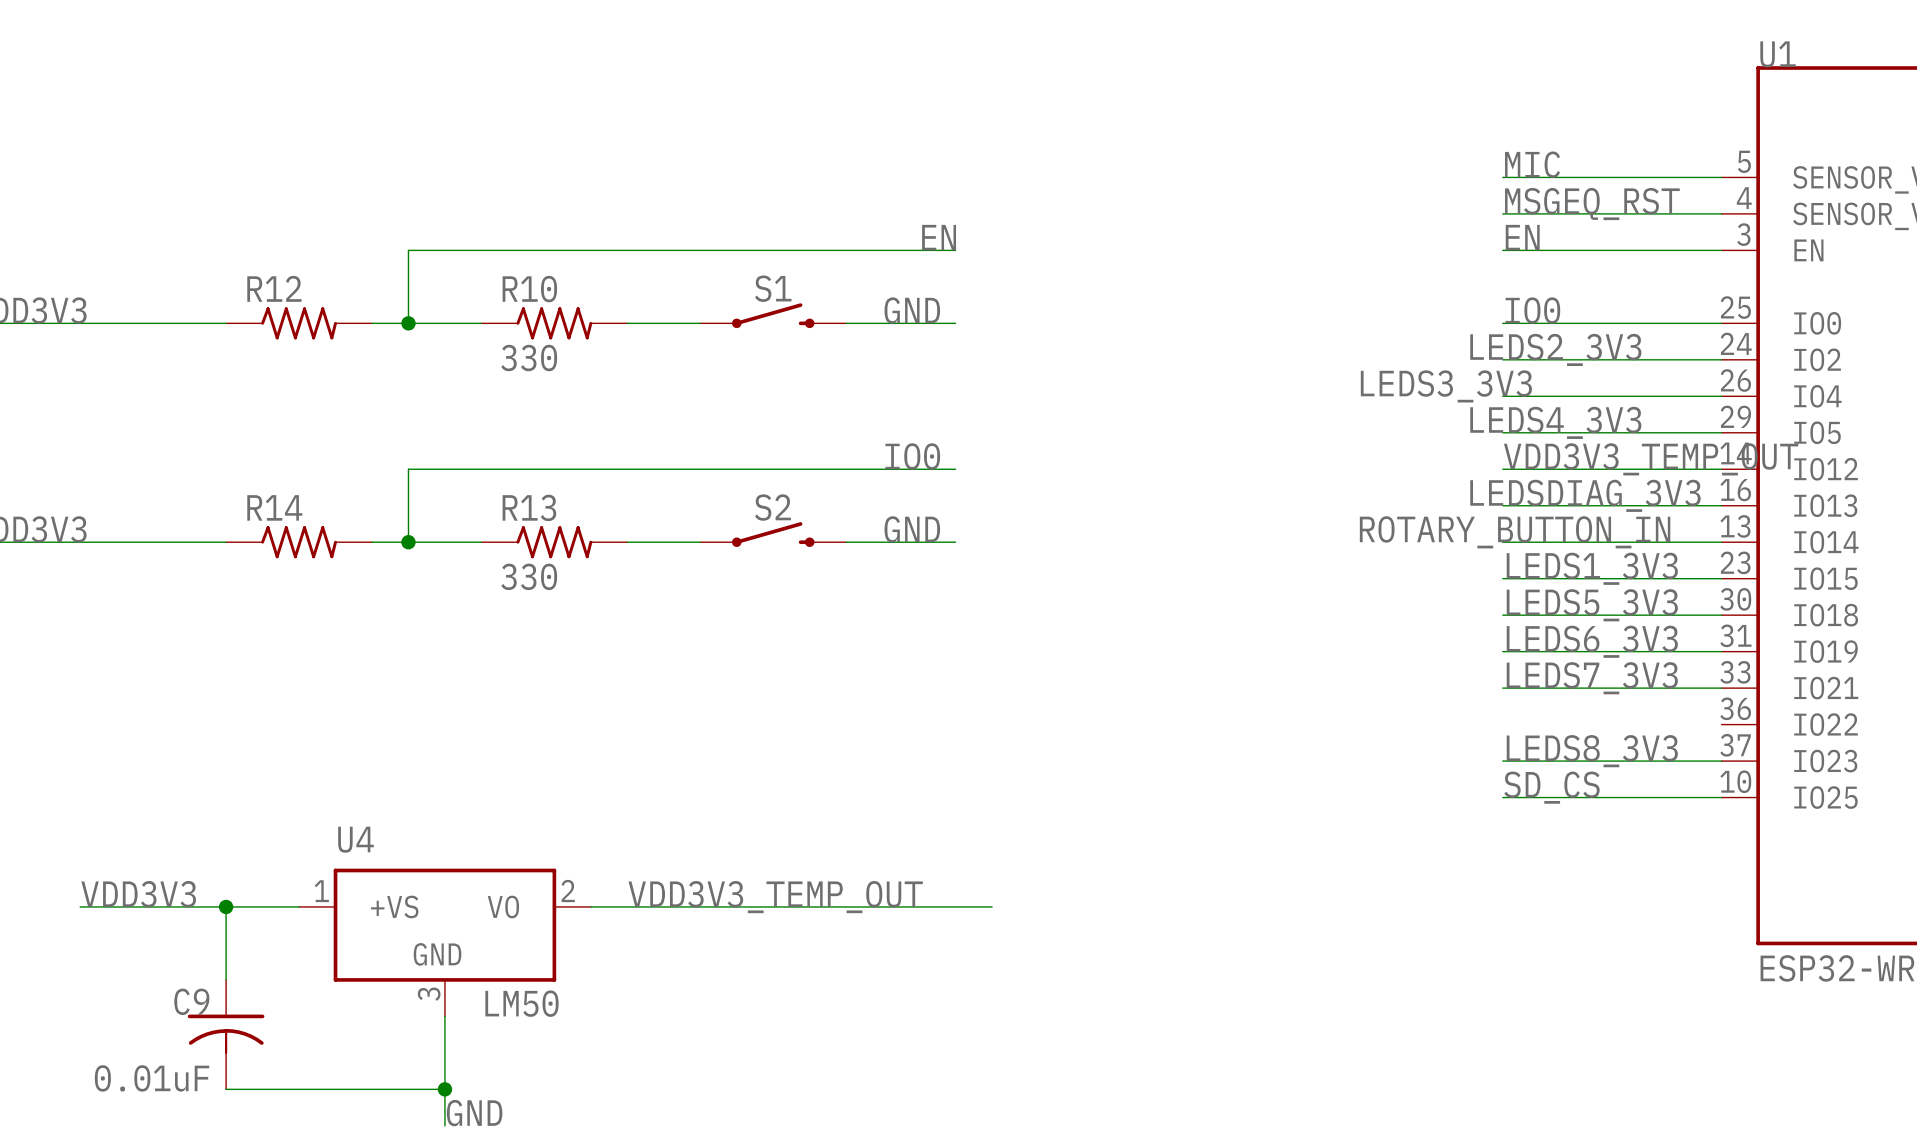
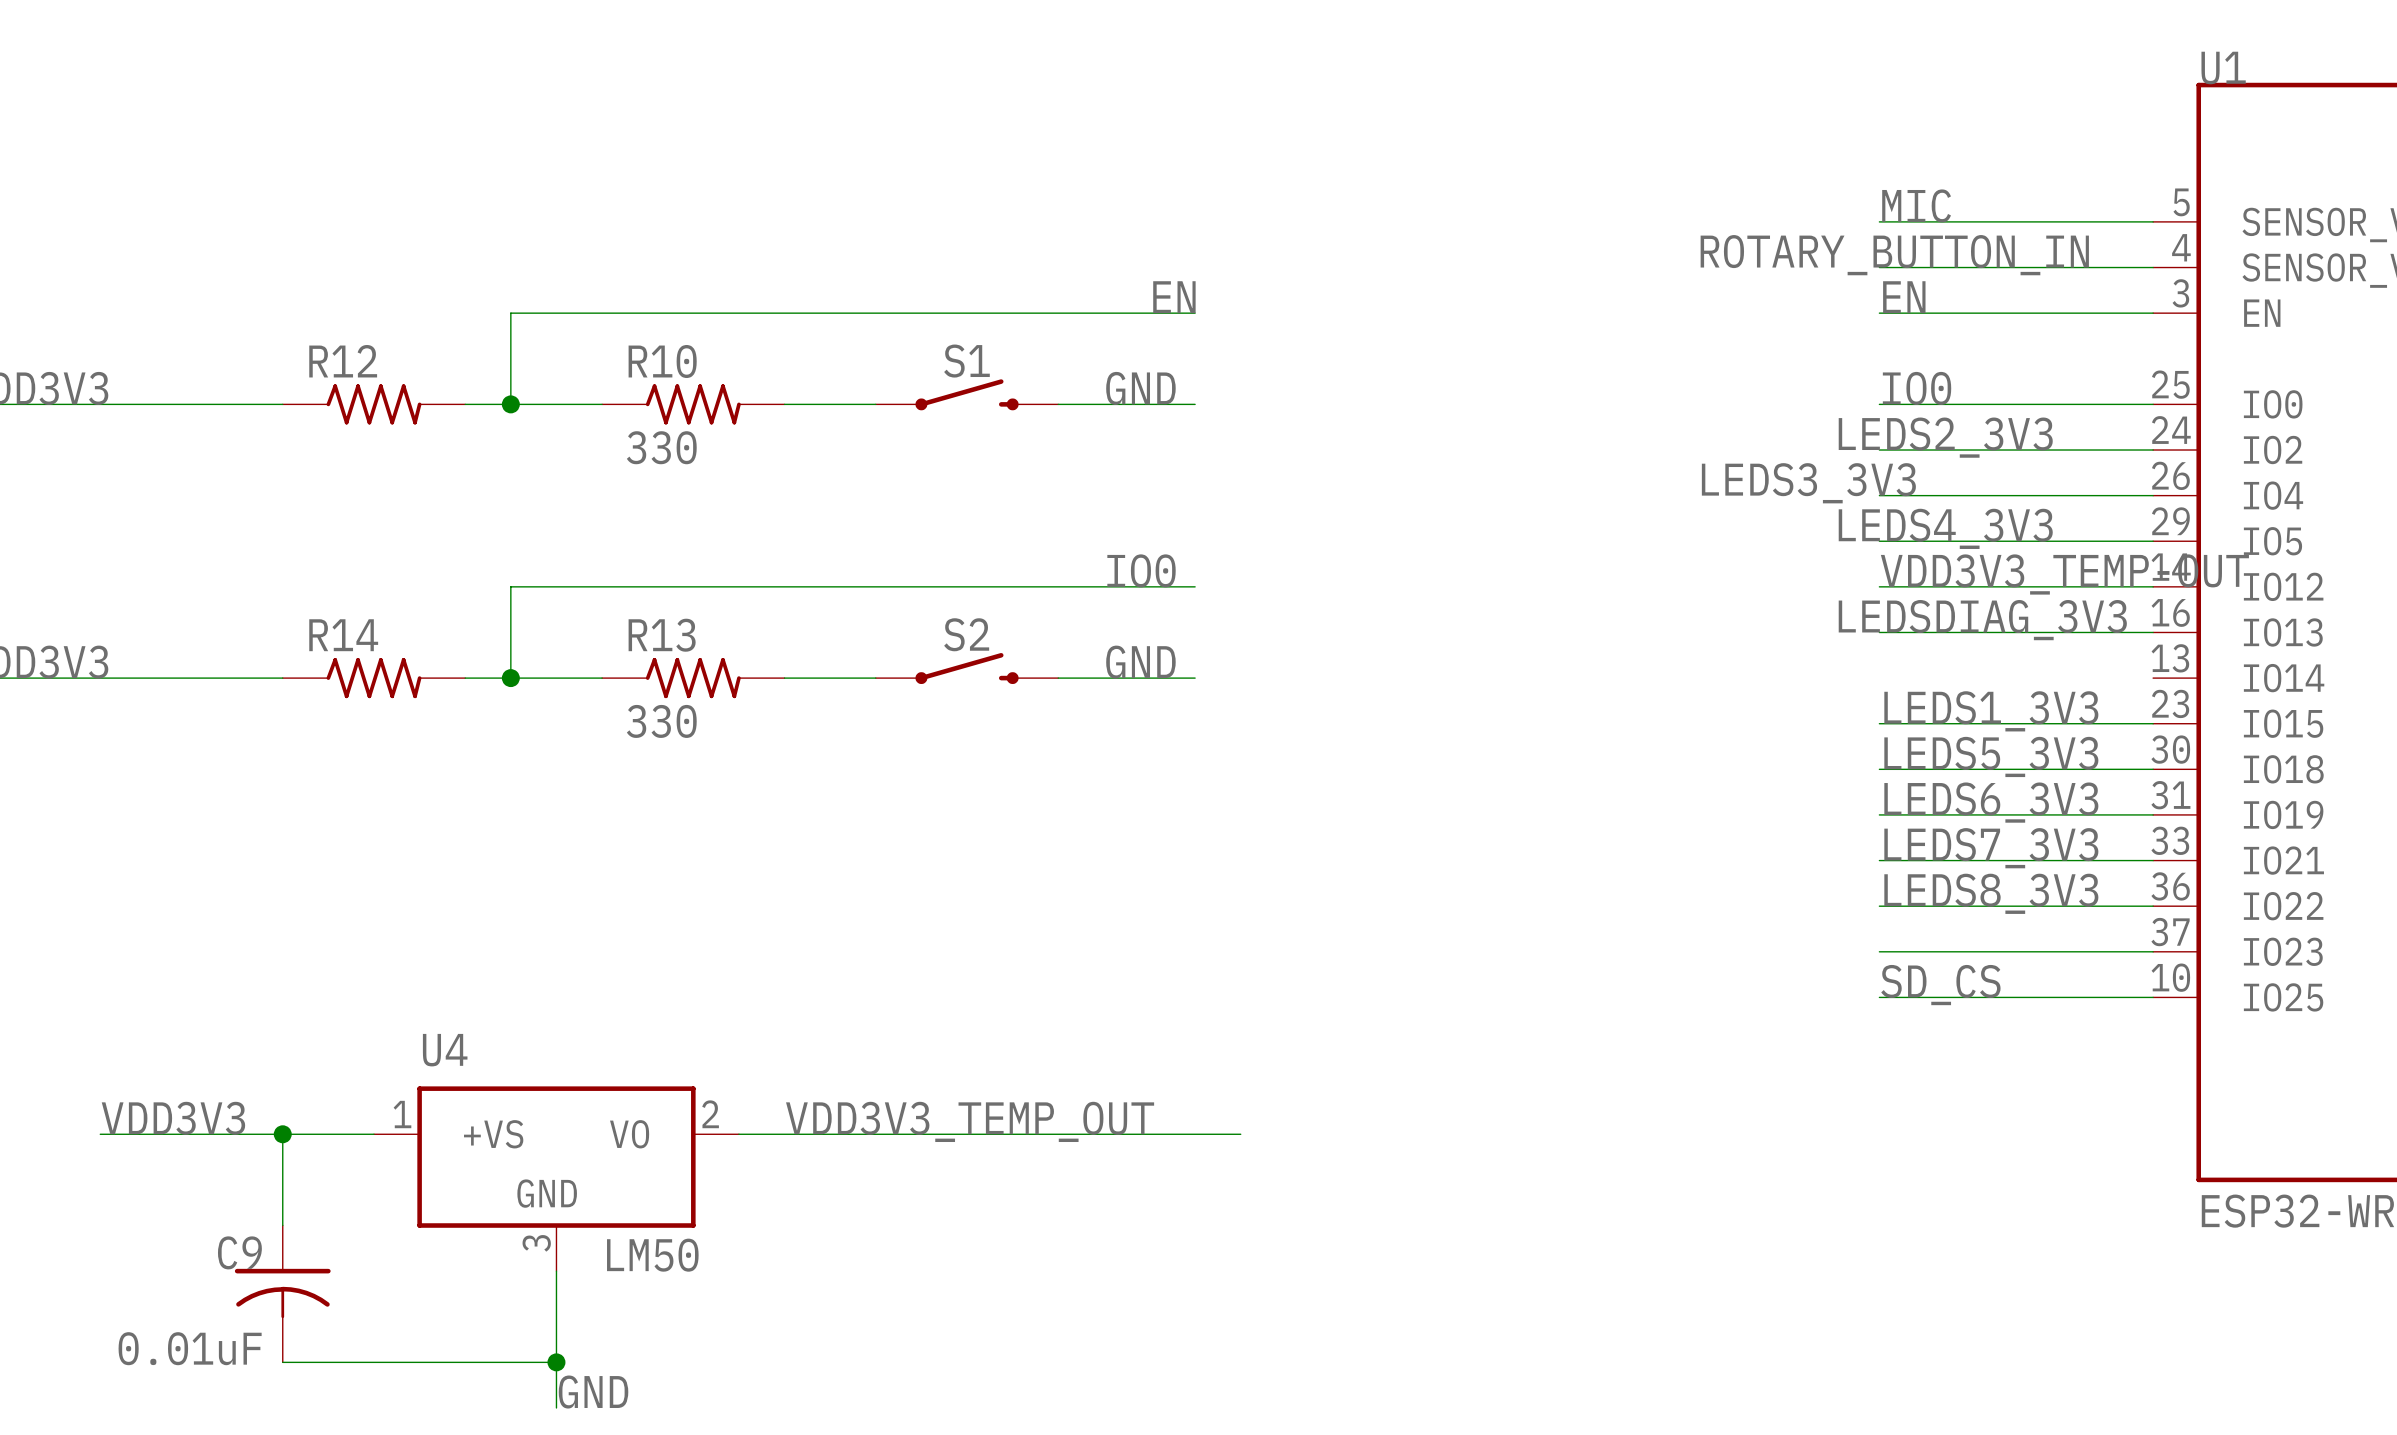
label: MSGEQ_RST (1592, 204) -> none
label: VDD3V3_TEMP_OUT (1651, 459) -> VDD3V3_TEMP-OUT (2064, 574)
label position: ROTARY_BUTTON_IN (1515, 532) -> ROTARY_BUTTON_IN (1894, 255)
wire: (1502, 542) (1721, 542) -> (1879, 906) (2153, 906)
label position: LEDS8_3V3 (1592, 751) -> LEDS8_3V3 (1991, 893)

